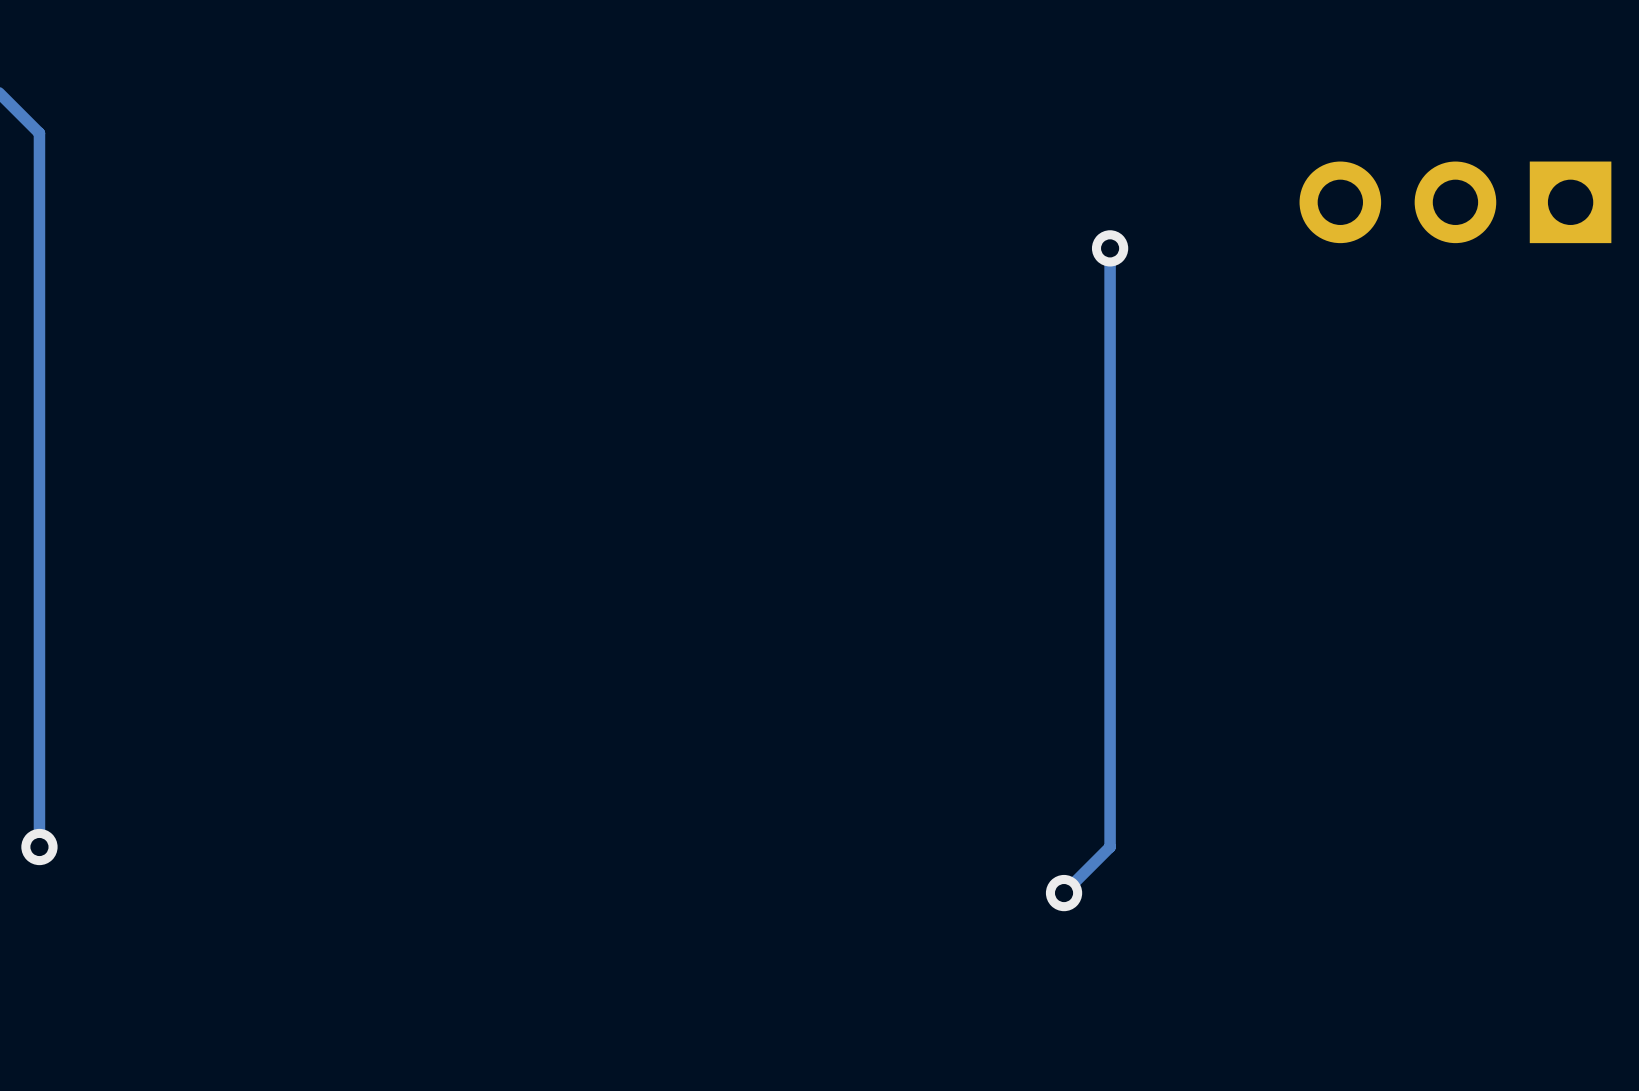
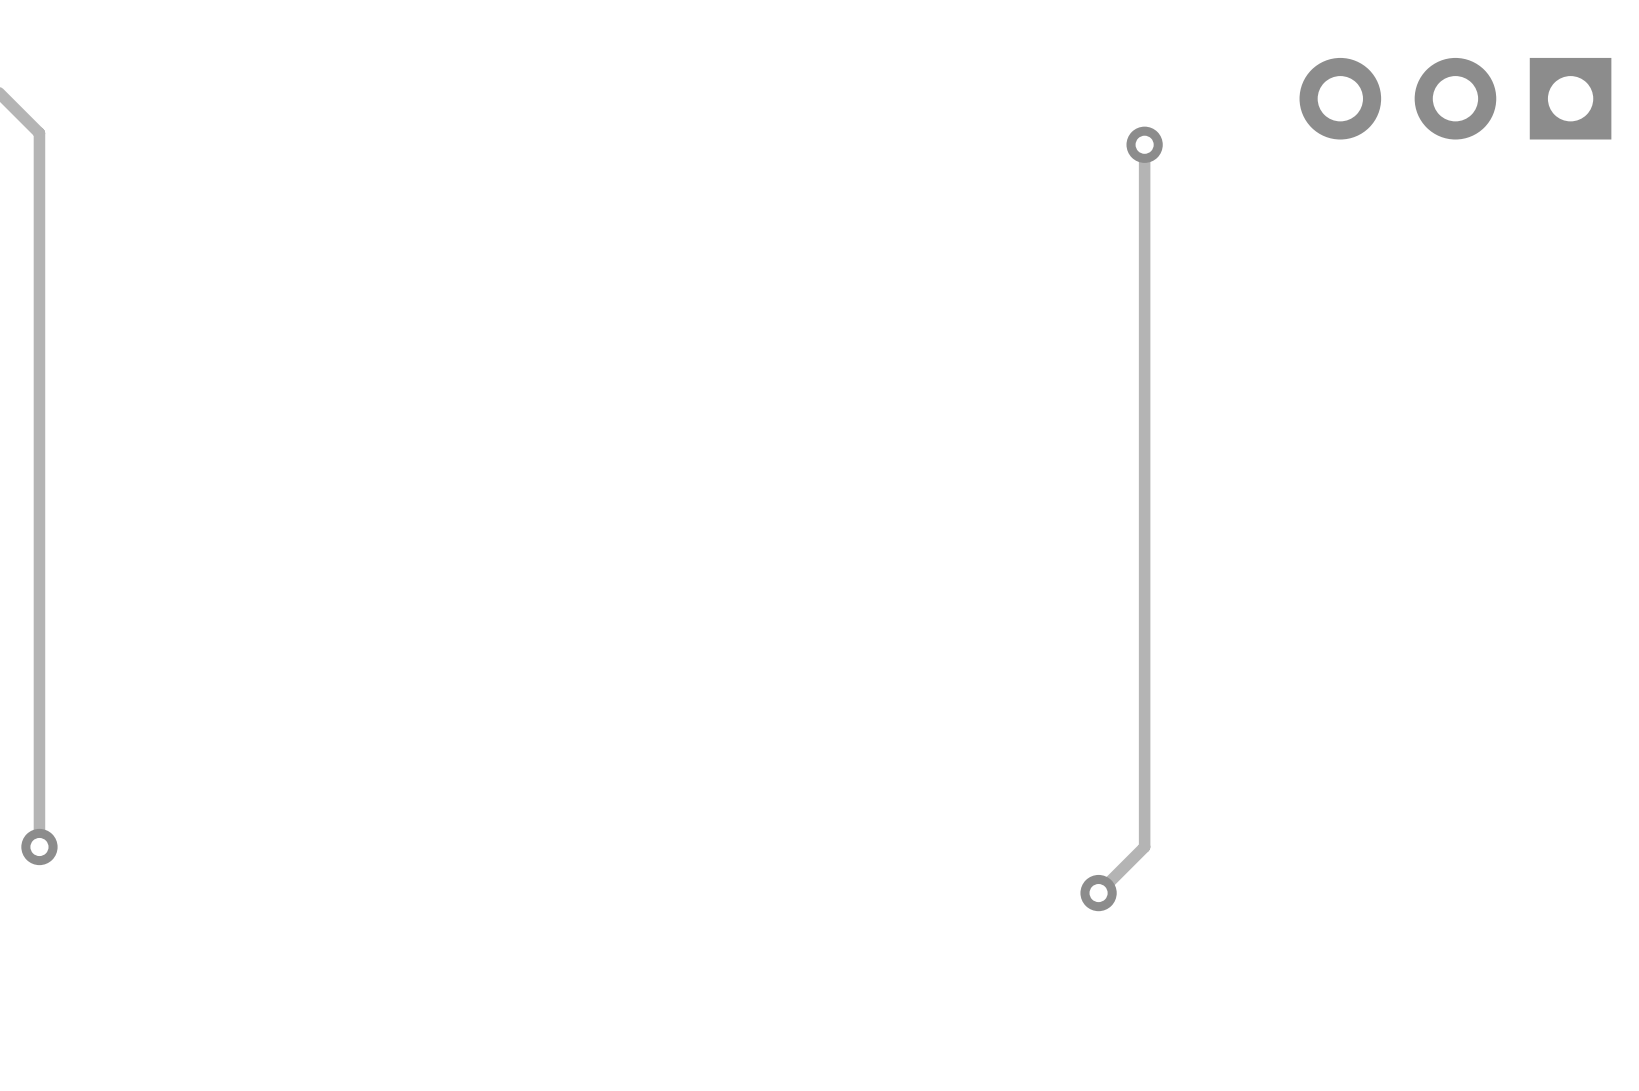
track: none -> (1144, 144) (1144, 847) (1098, 893)
part position: (1455, 202) -> (1455, 98)
track: (1110, 248) (1110, 847) (1064, 893) -> none
via position: (1110, 248) -> (1144, 144)
via position: (1064, 893) -> (1098, 893)

